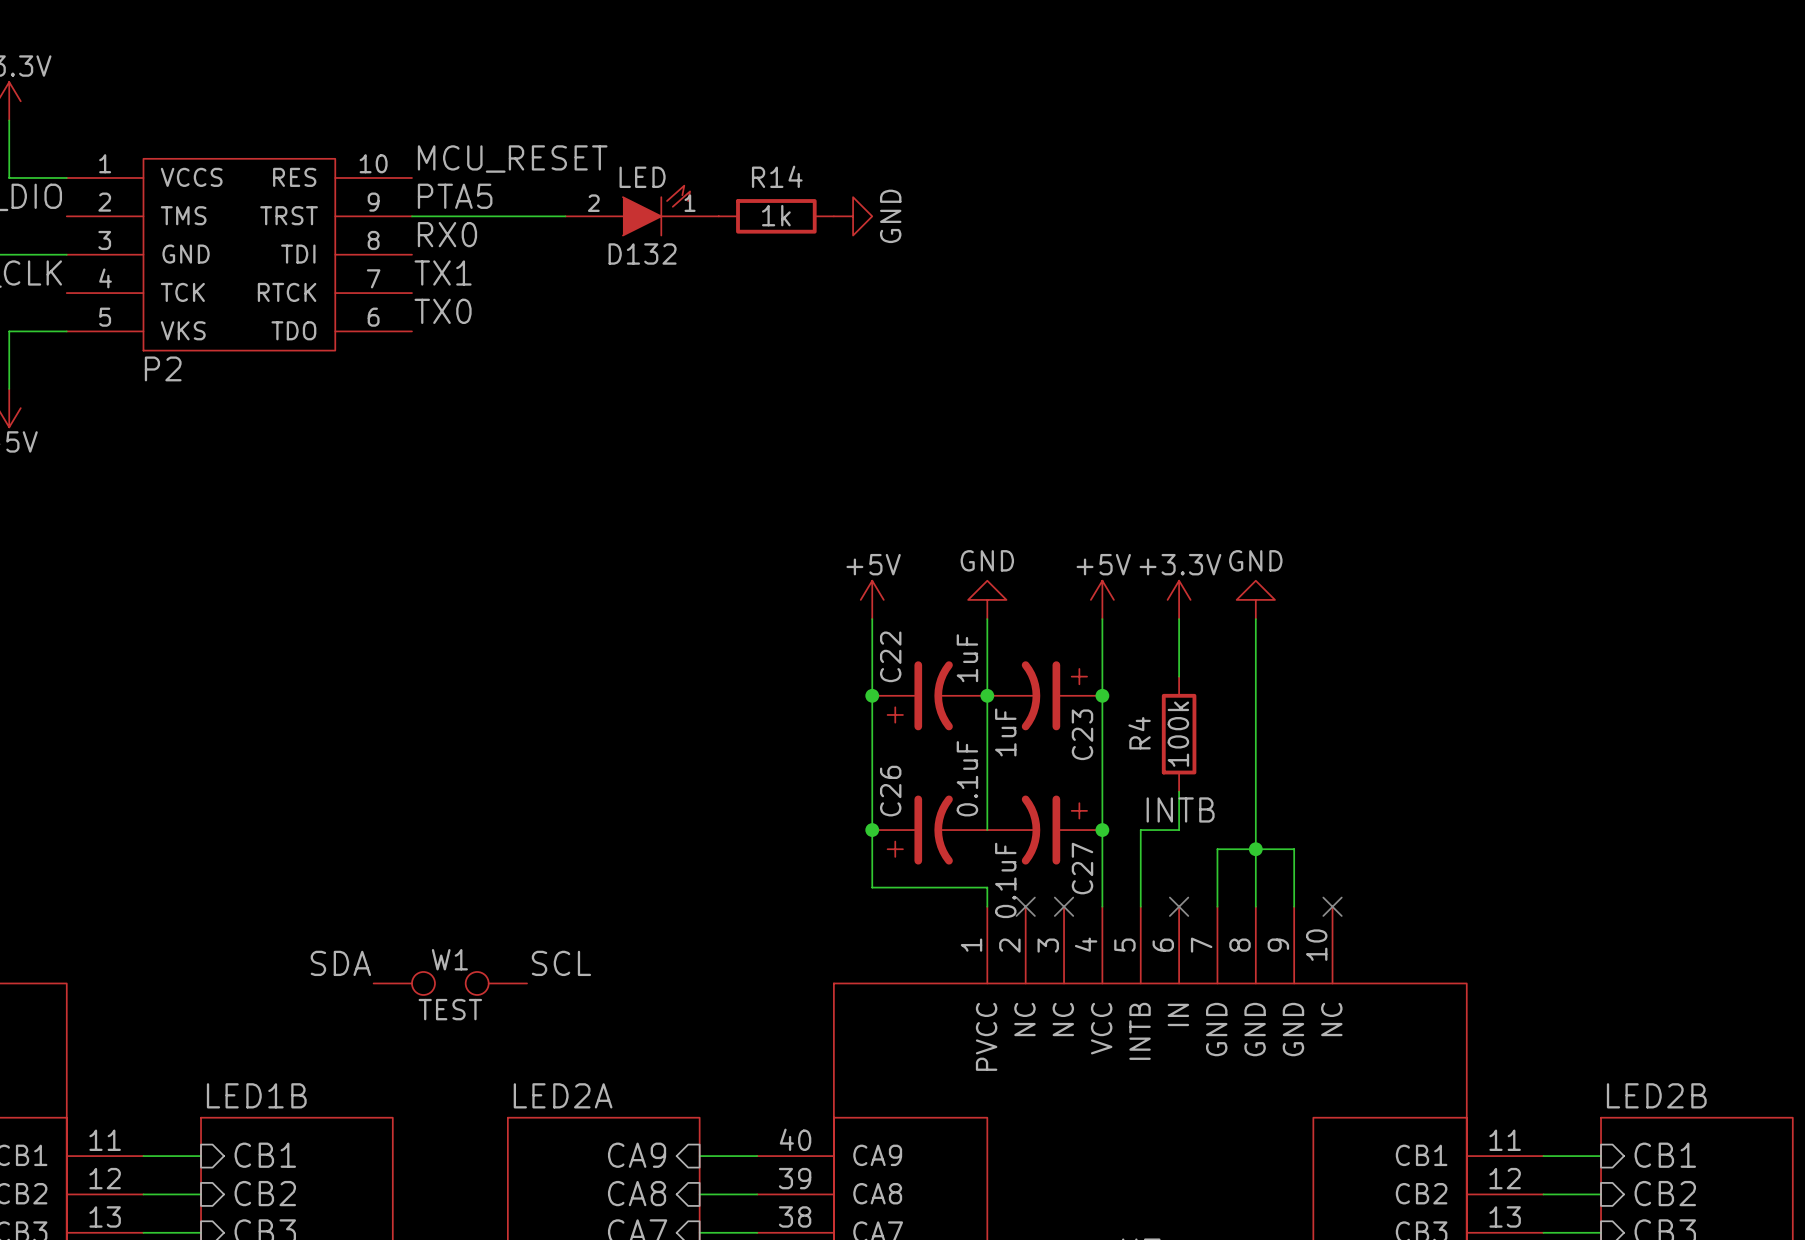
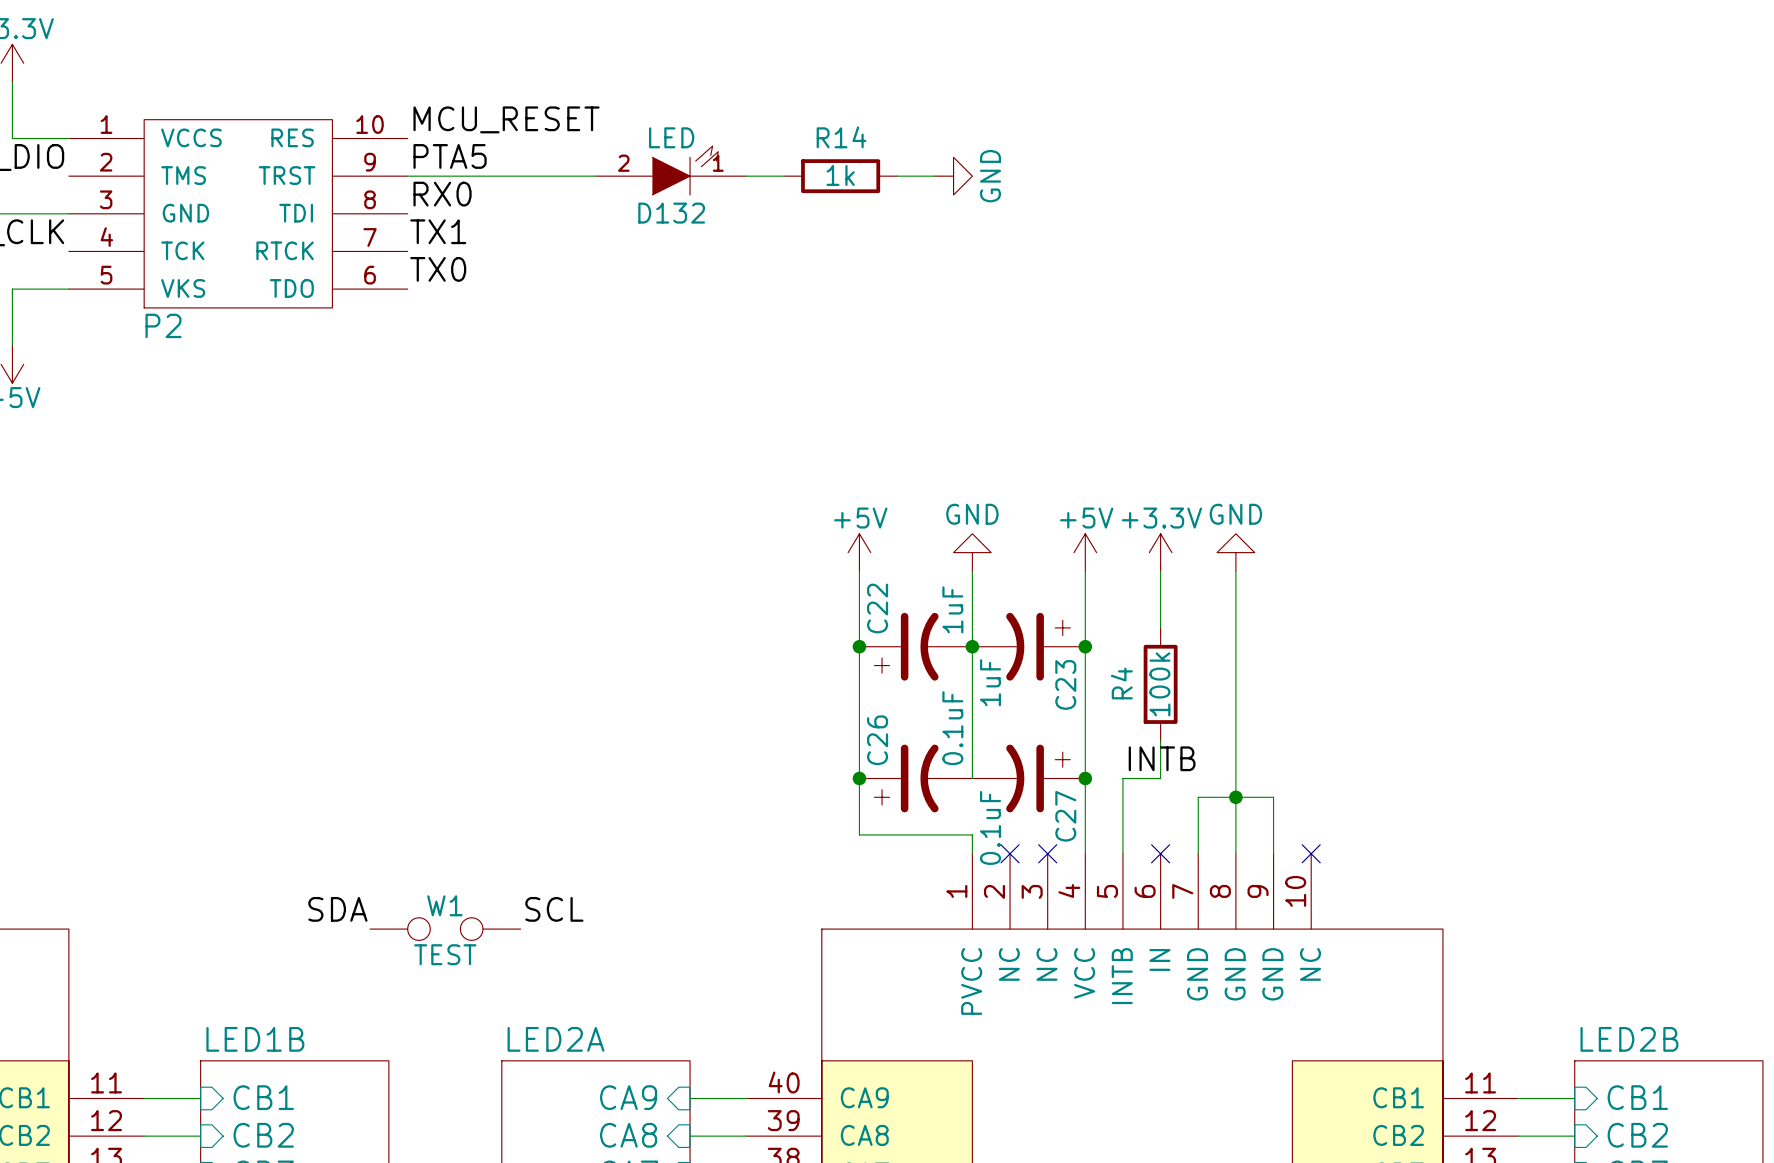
D132 position: (642, 210) -> (671, 170)
wire: none -> (746, 176) (784, 176)
R14 position: (776, 216) -> (840, 176)
power symbol position: GND (853, 216) -> GND (953, 176)
wire: none -> (897, 176) (934, 176)

